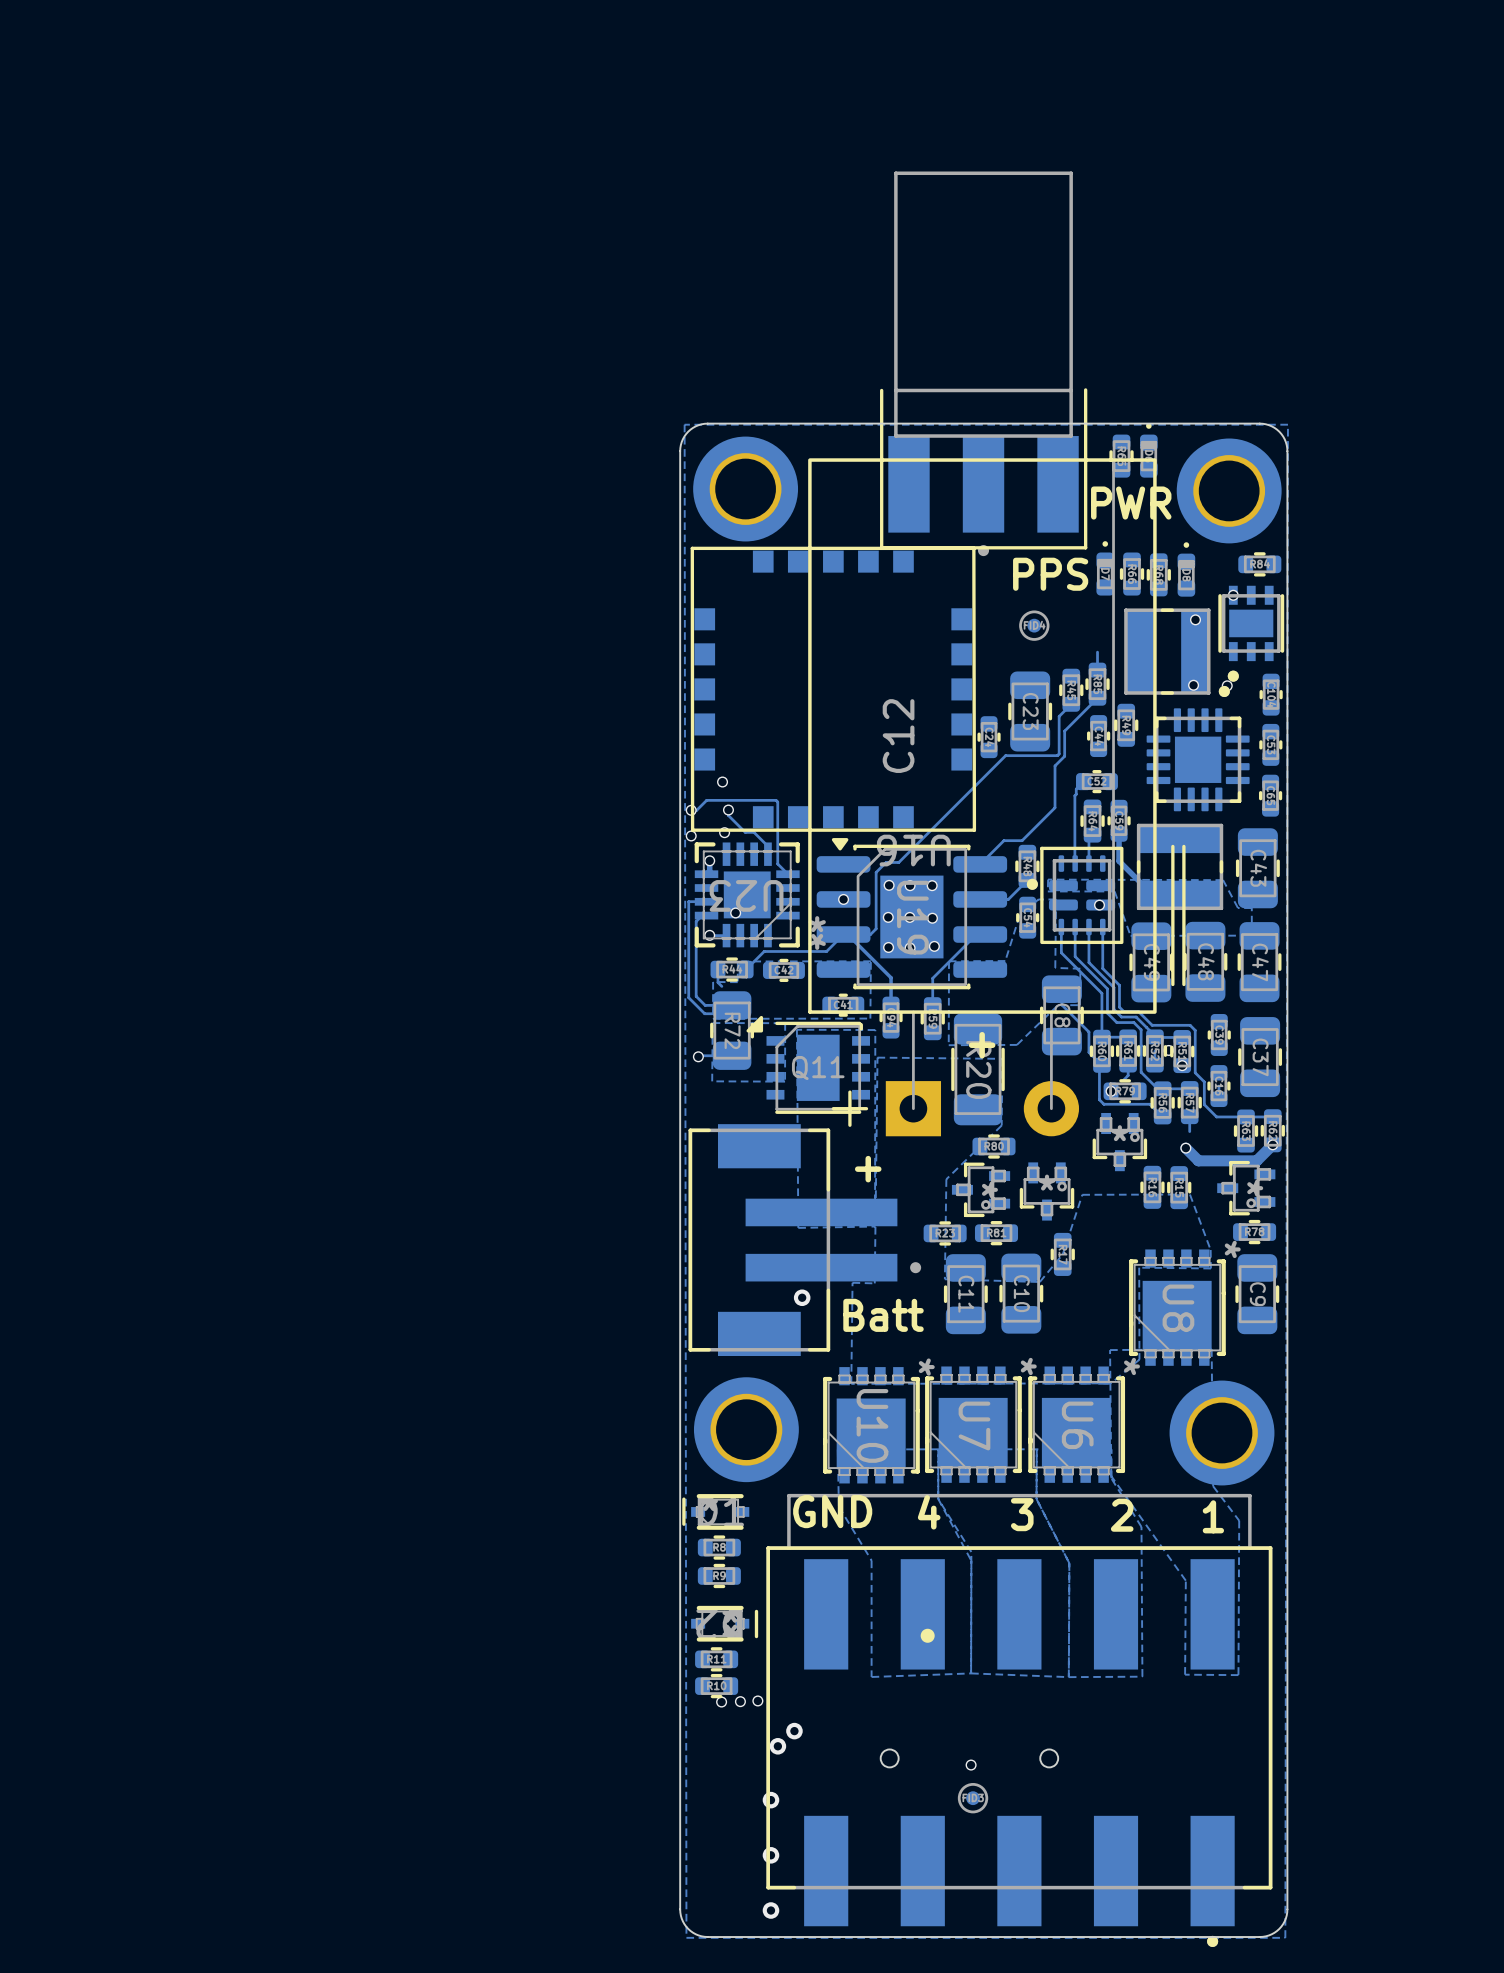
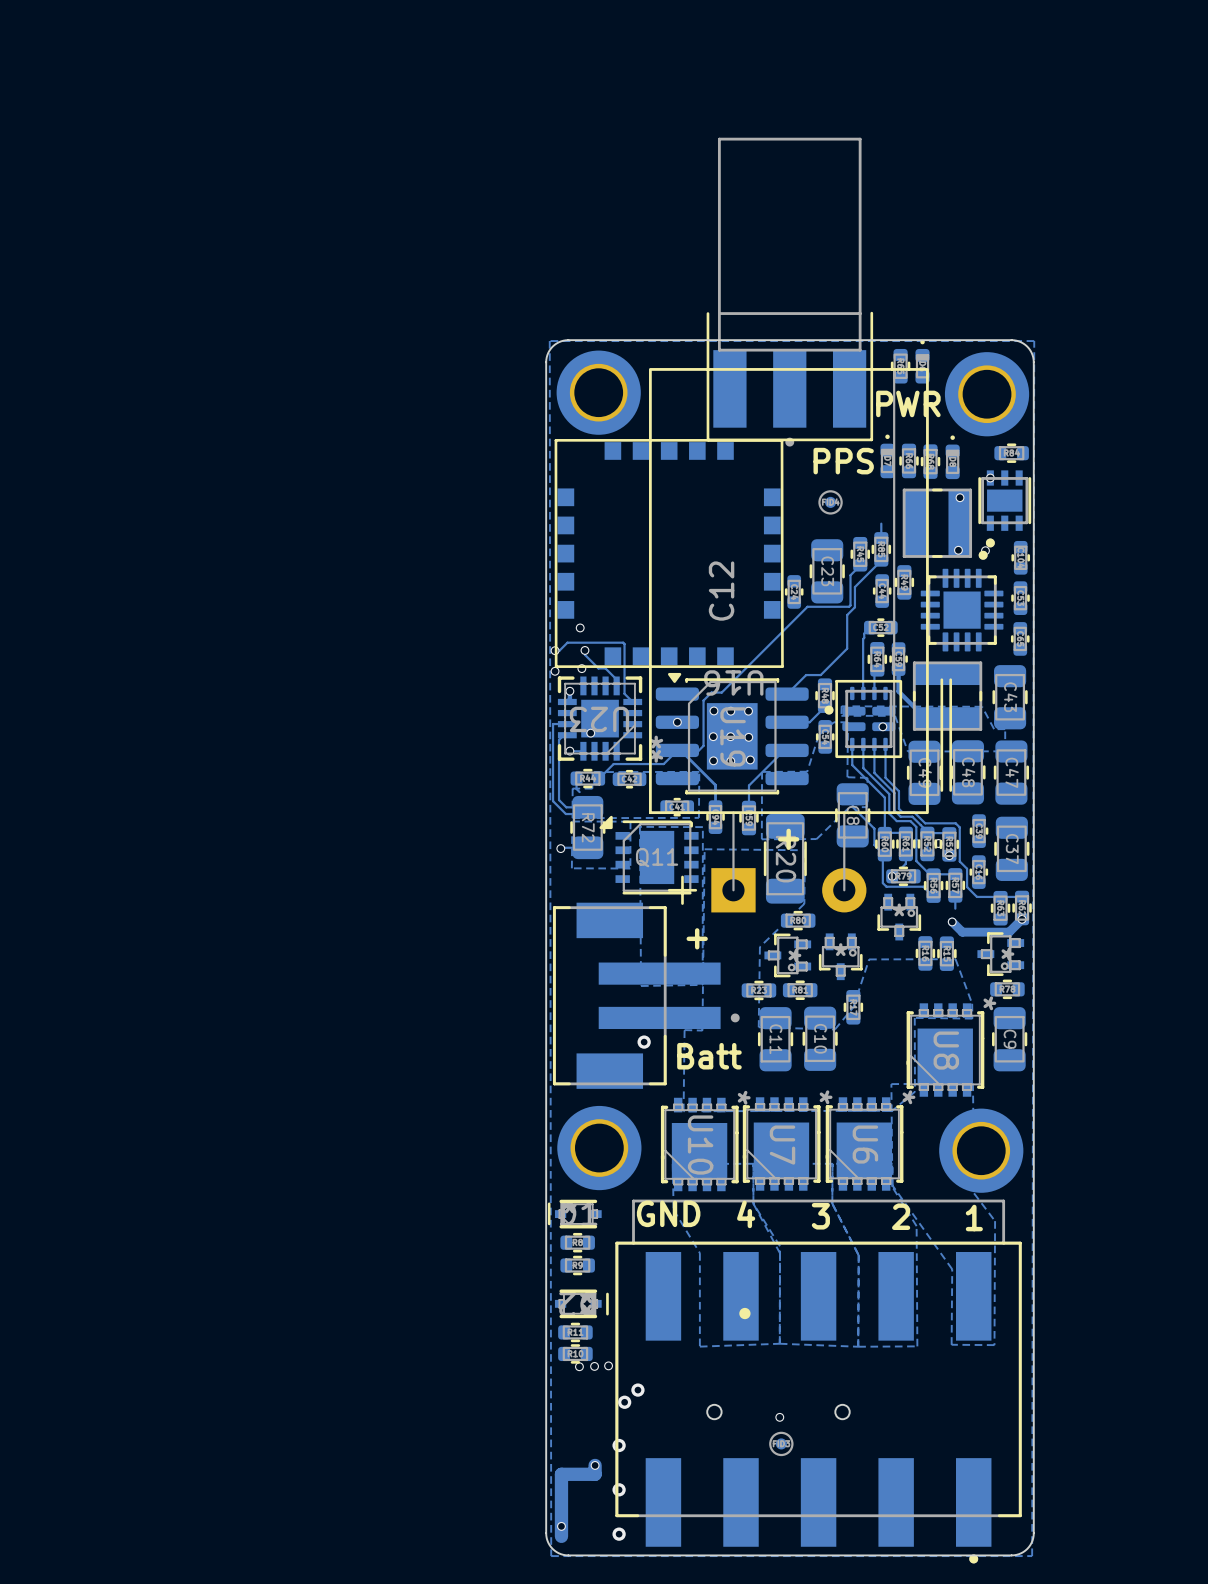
track: none -> (595, 1465) (595, 1474) (561, 1474) (561, 1536)
via: none -> (595, 1465)
via: none -> (561, 1526)

